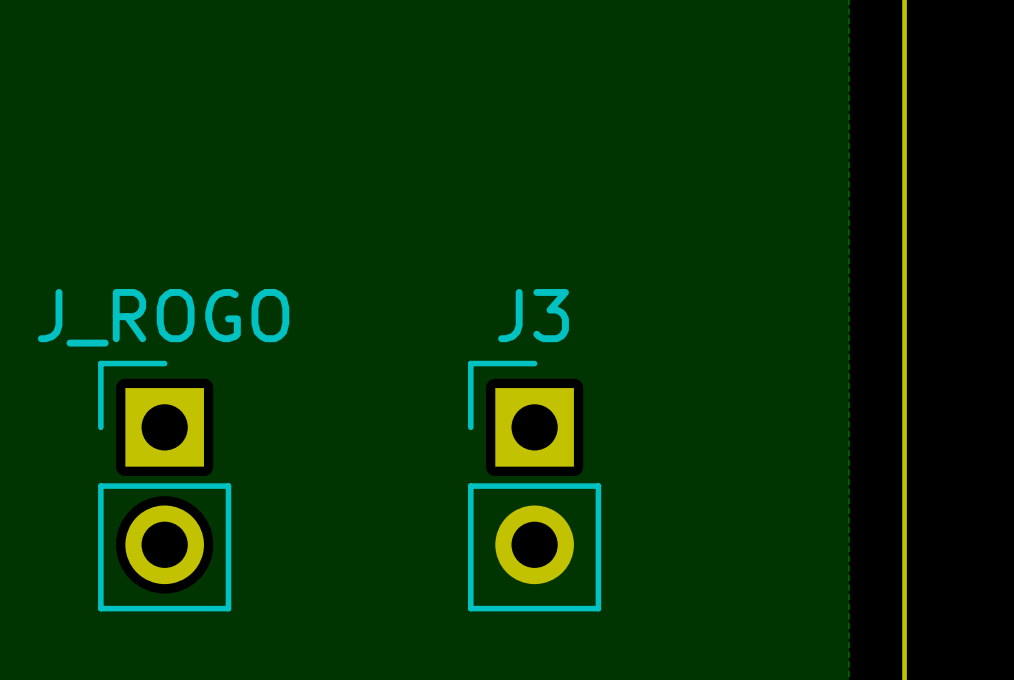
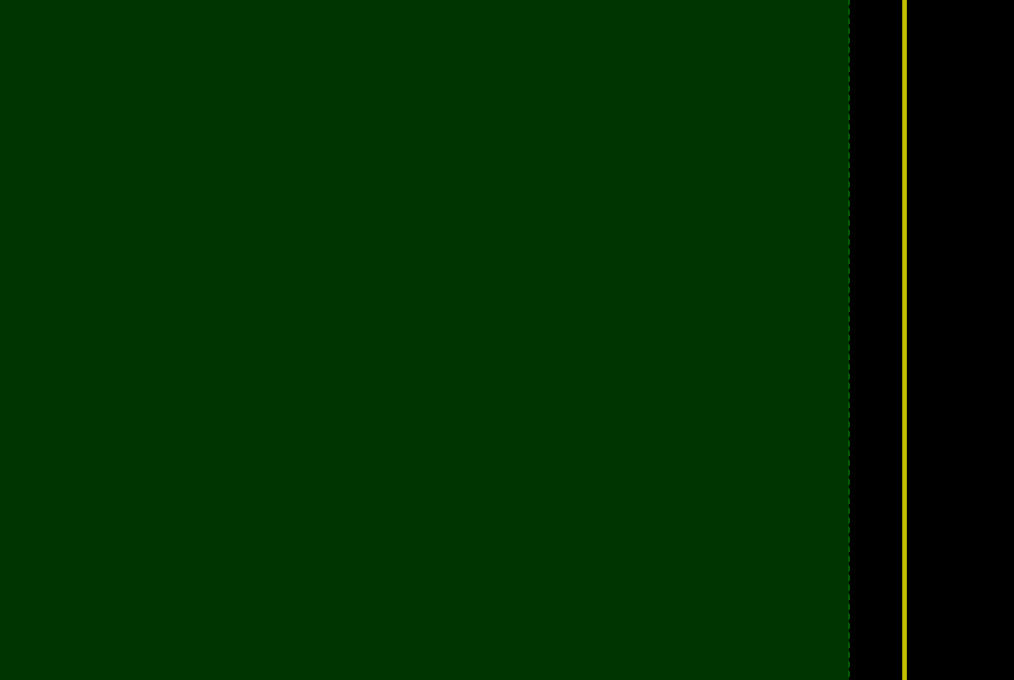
J_ROGO: (164, 486) -> none
J3: (534, 486) -> none

